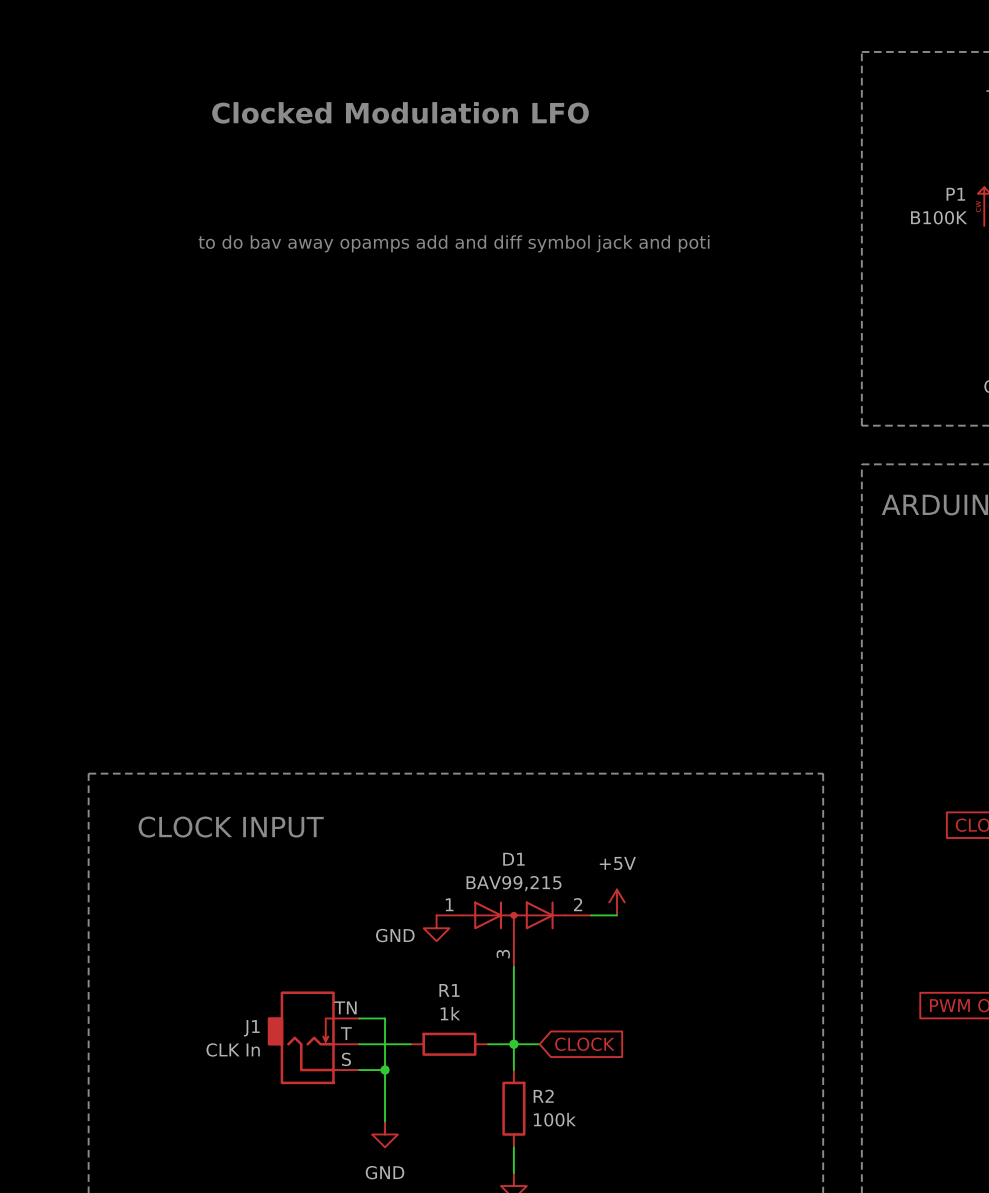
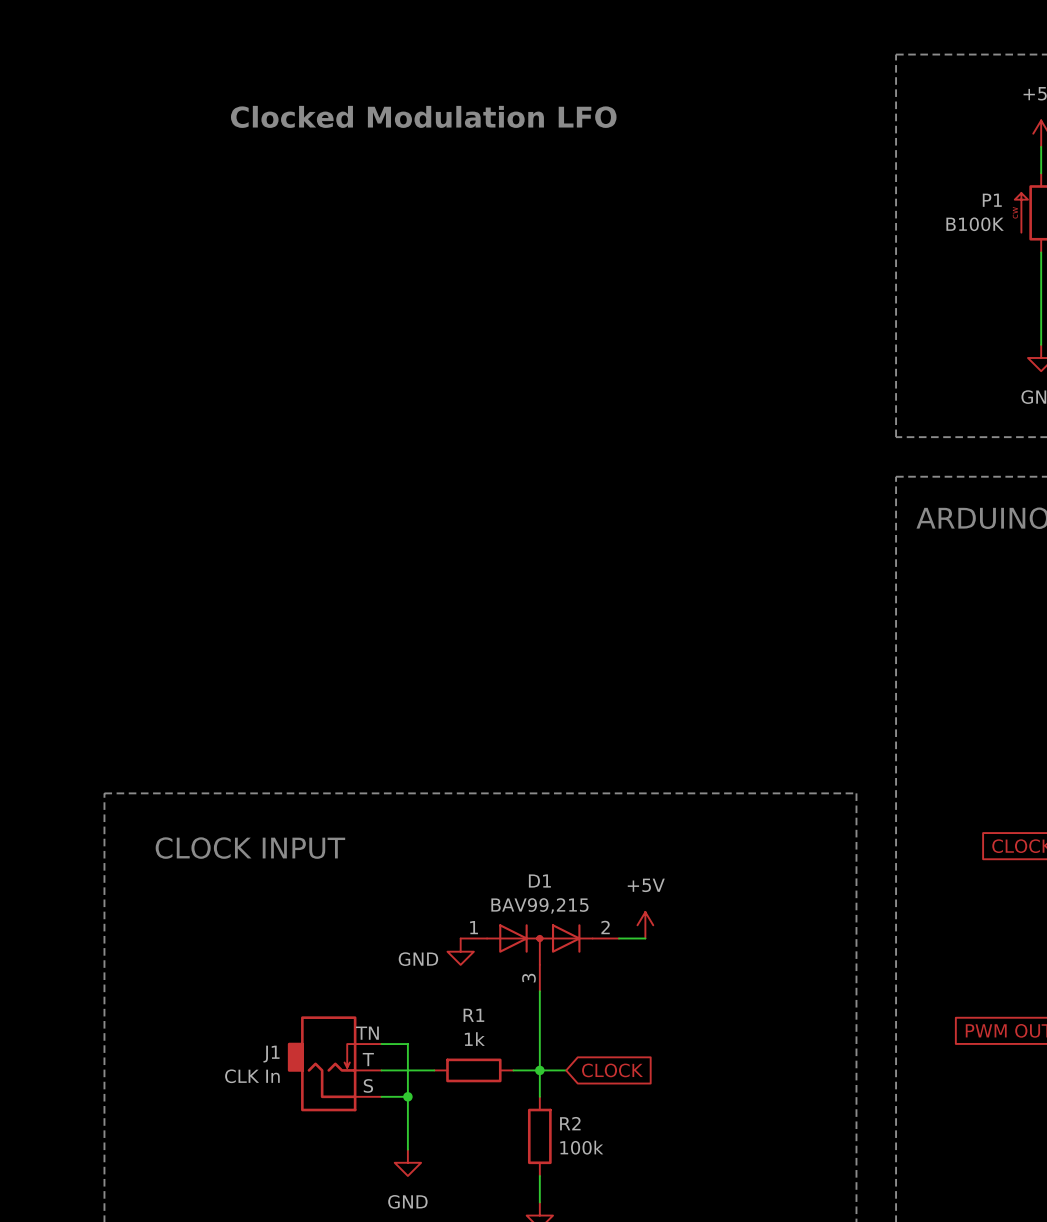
text: to do bav away opamps add and diff symbol jack and poti (454, 243) -> none

